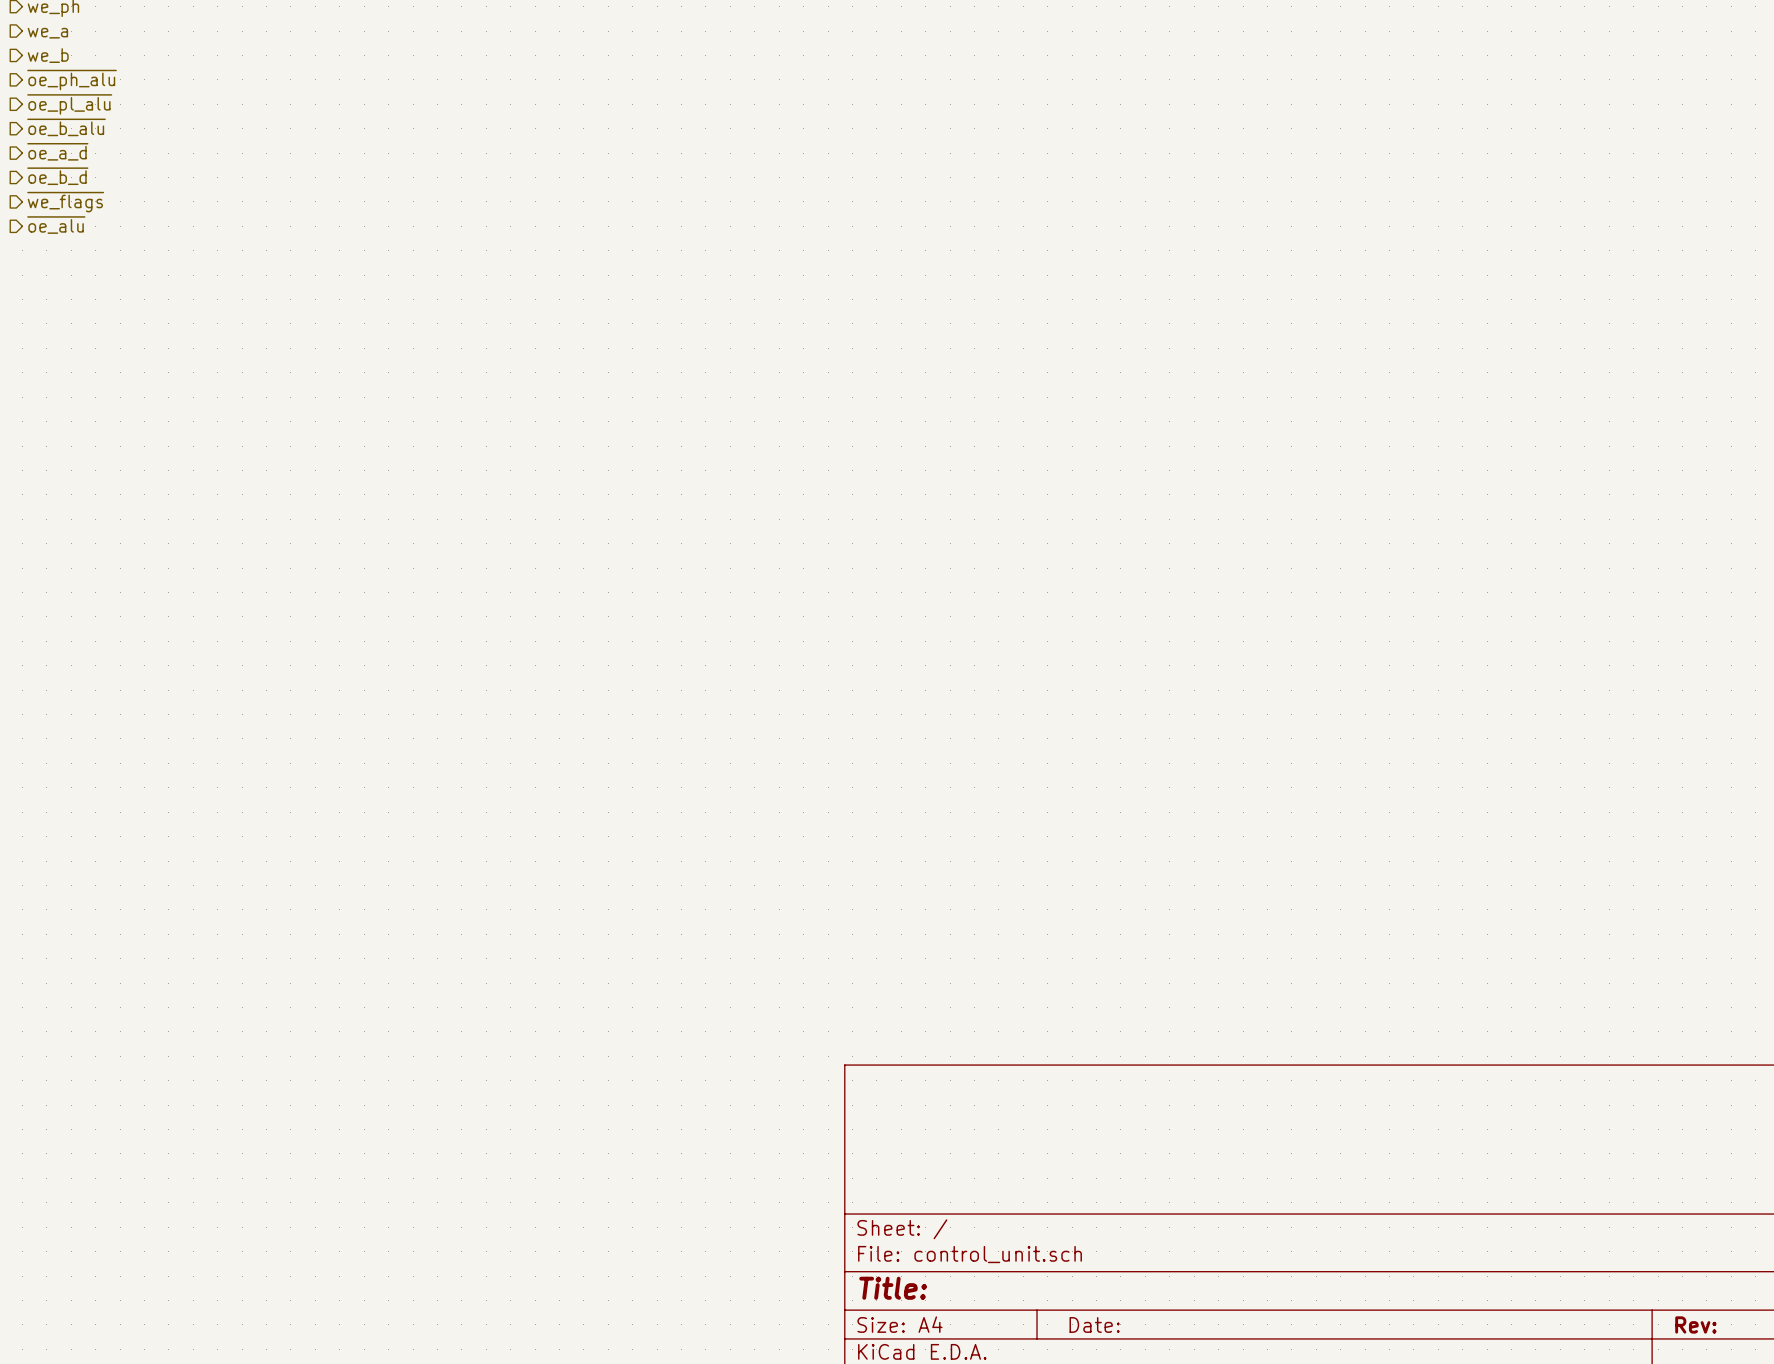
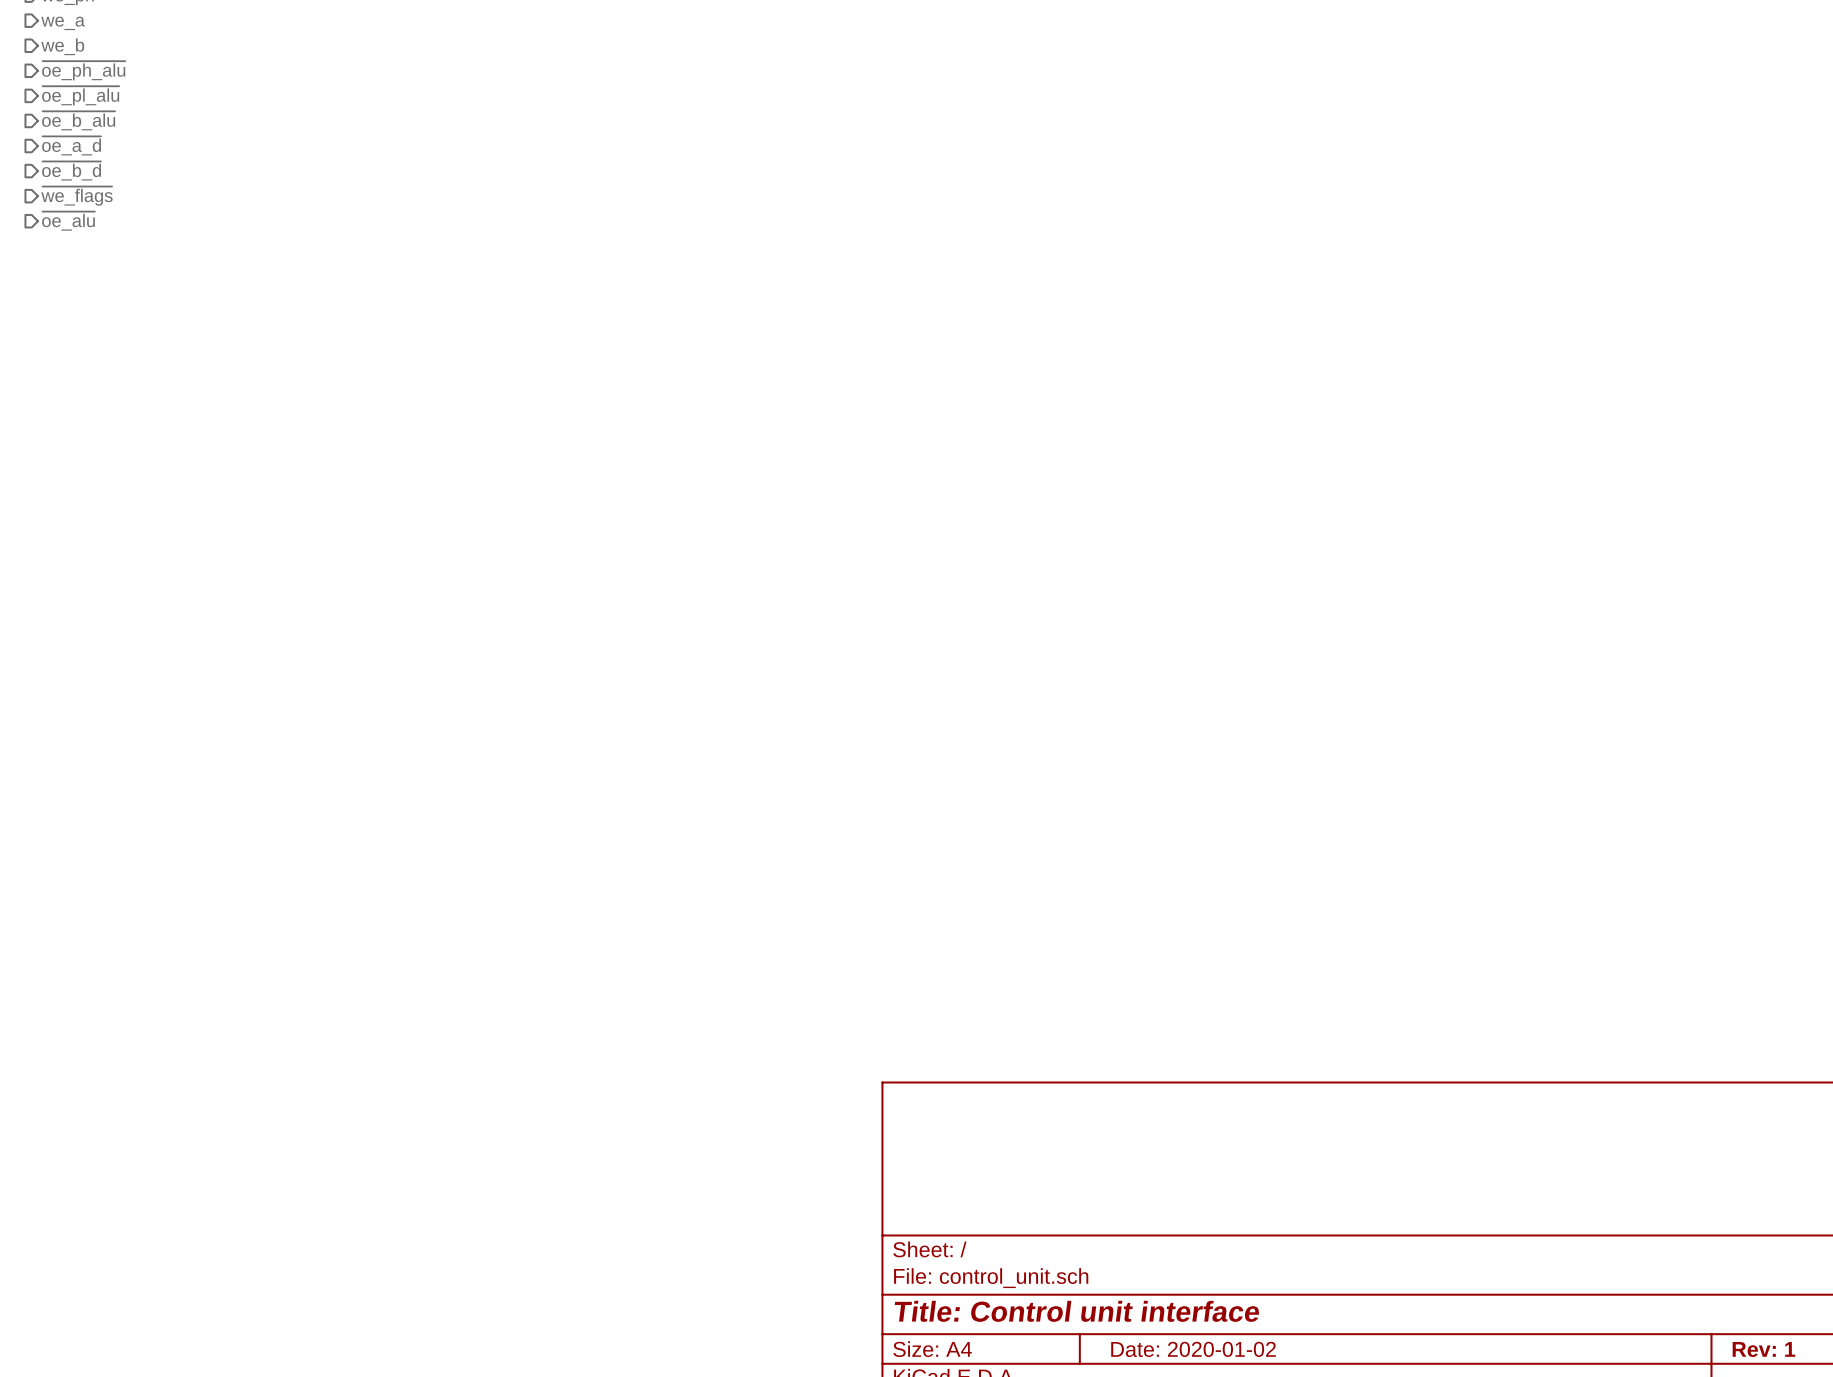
title block: Title: (893, 1288) -> Title: Control unit interface (1077, 1311)
title block: Date: (1094, 1324) -> Date: 2020-01-02 (1193, 1349)
title block: Rev: (1695, 1324) -> Rev: 1 (1763, 1349)

